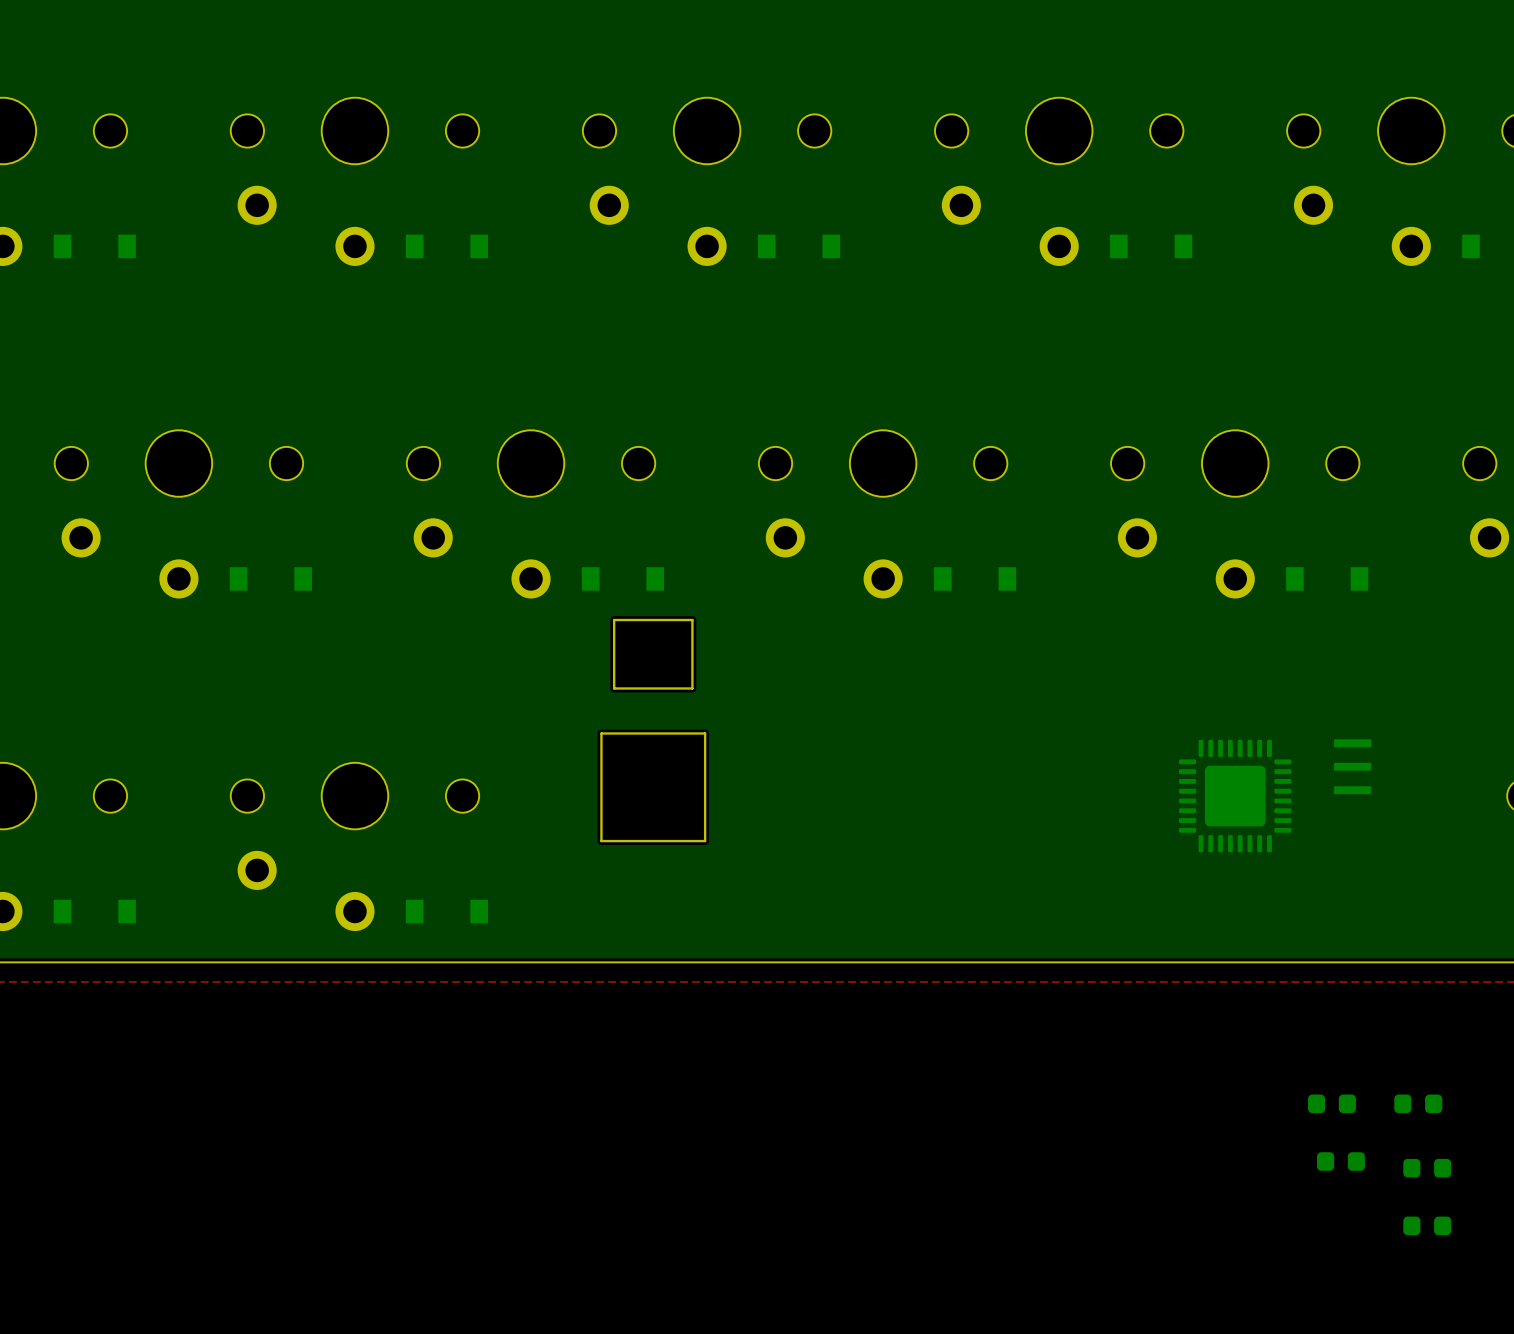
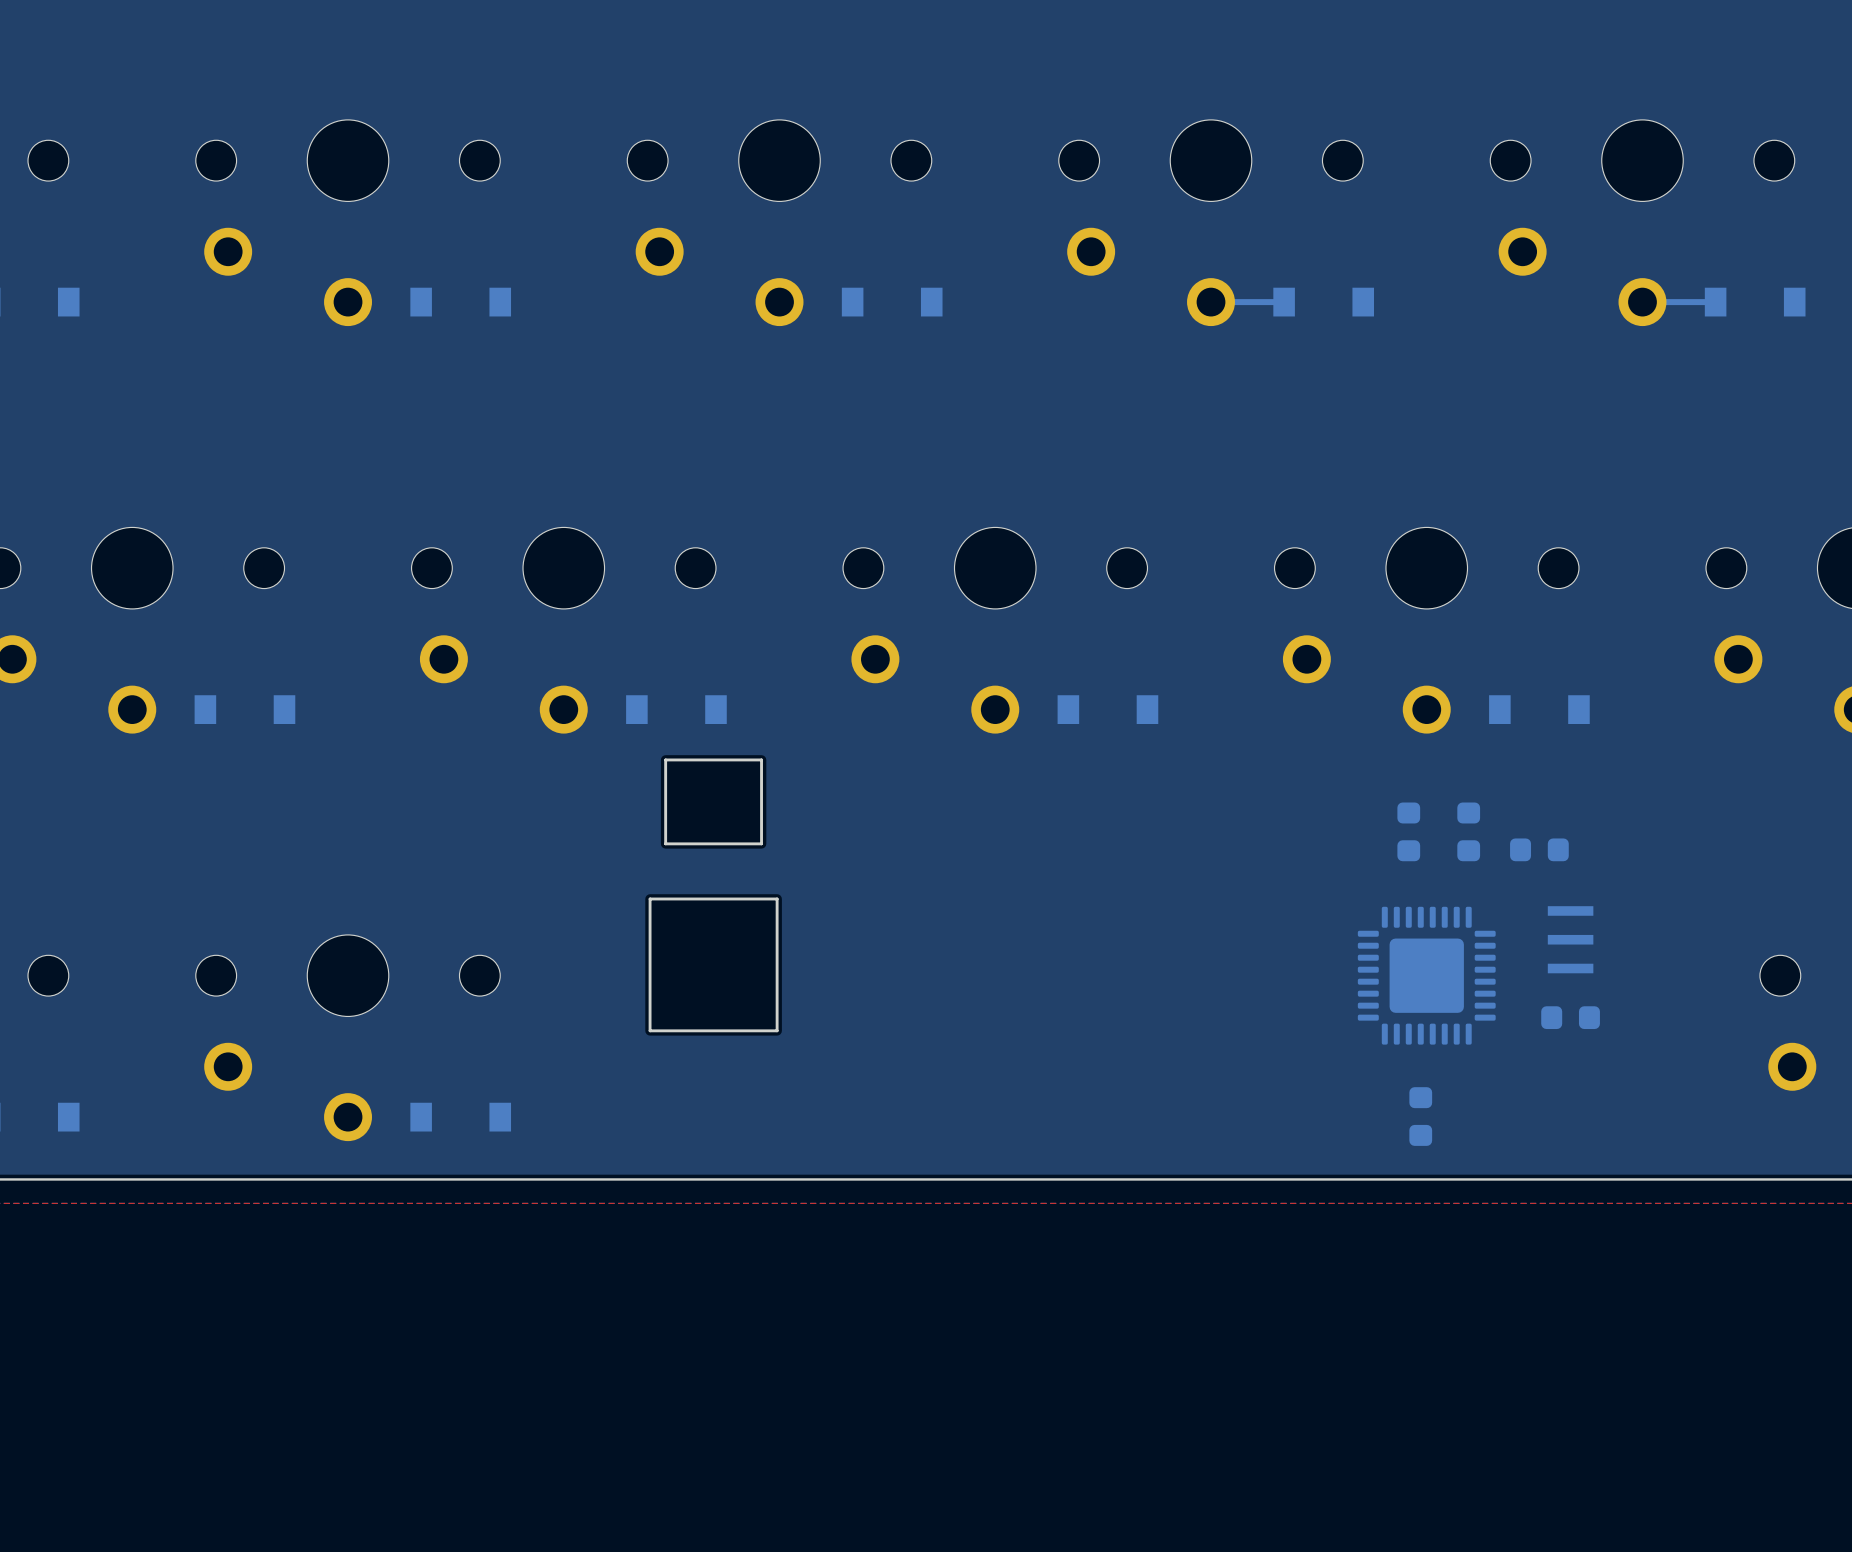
bottom track: none -> (1211, 302) (1284, 302)
bottom track: none -> (1642, 302) (1715, 302)
part: none -> (1408, 831)
part: none -> (1468, 831)
part: none -> (1539, 849)
part: none -> (1570, 1017)
part: none -> (1420, 1116)
part: (1331, 1103) -> none
part: (1418, 1103) -> none
part: (1340, 1161) -> none
part: (1427, 1168) -> none
part: (1427, 1225) -> none

